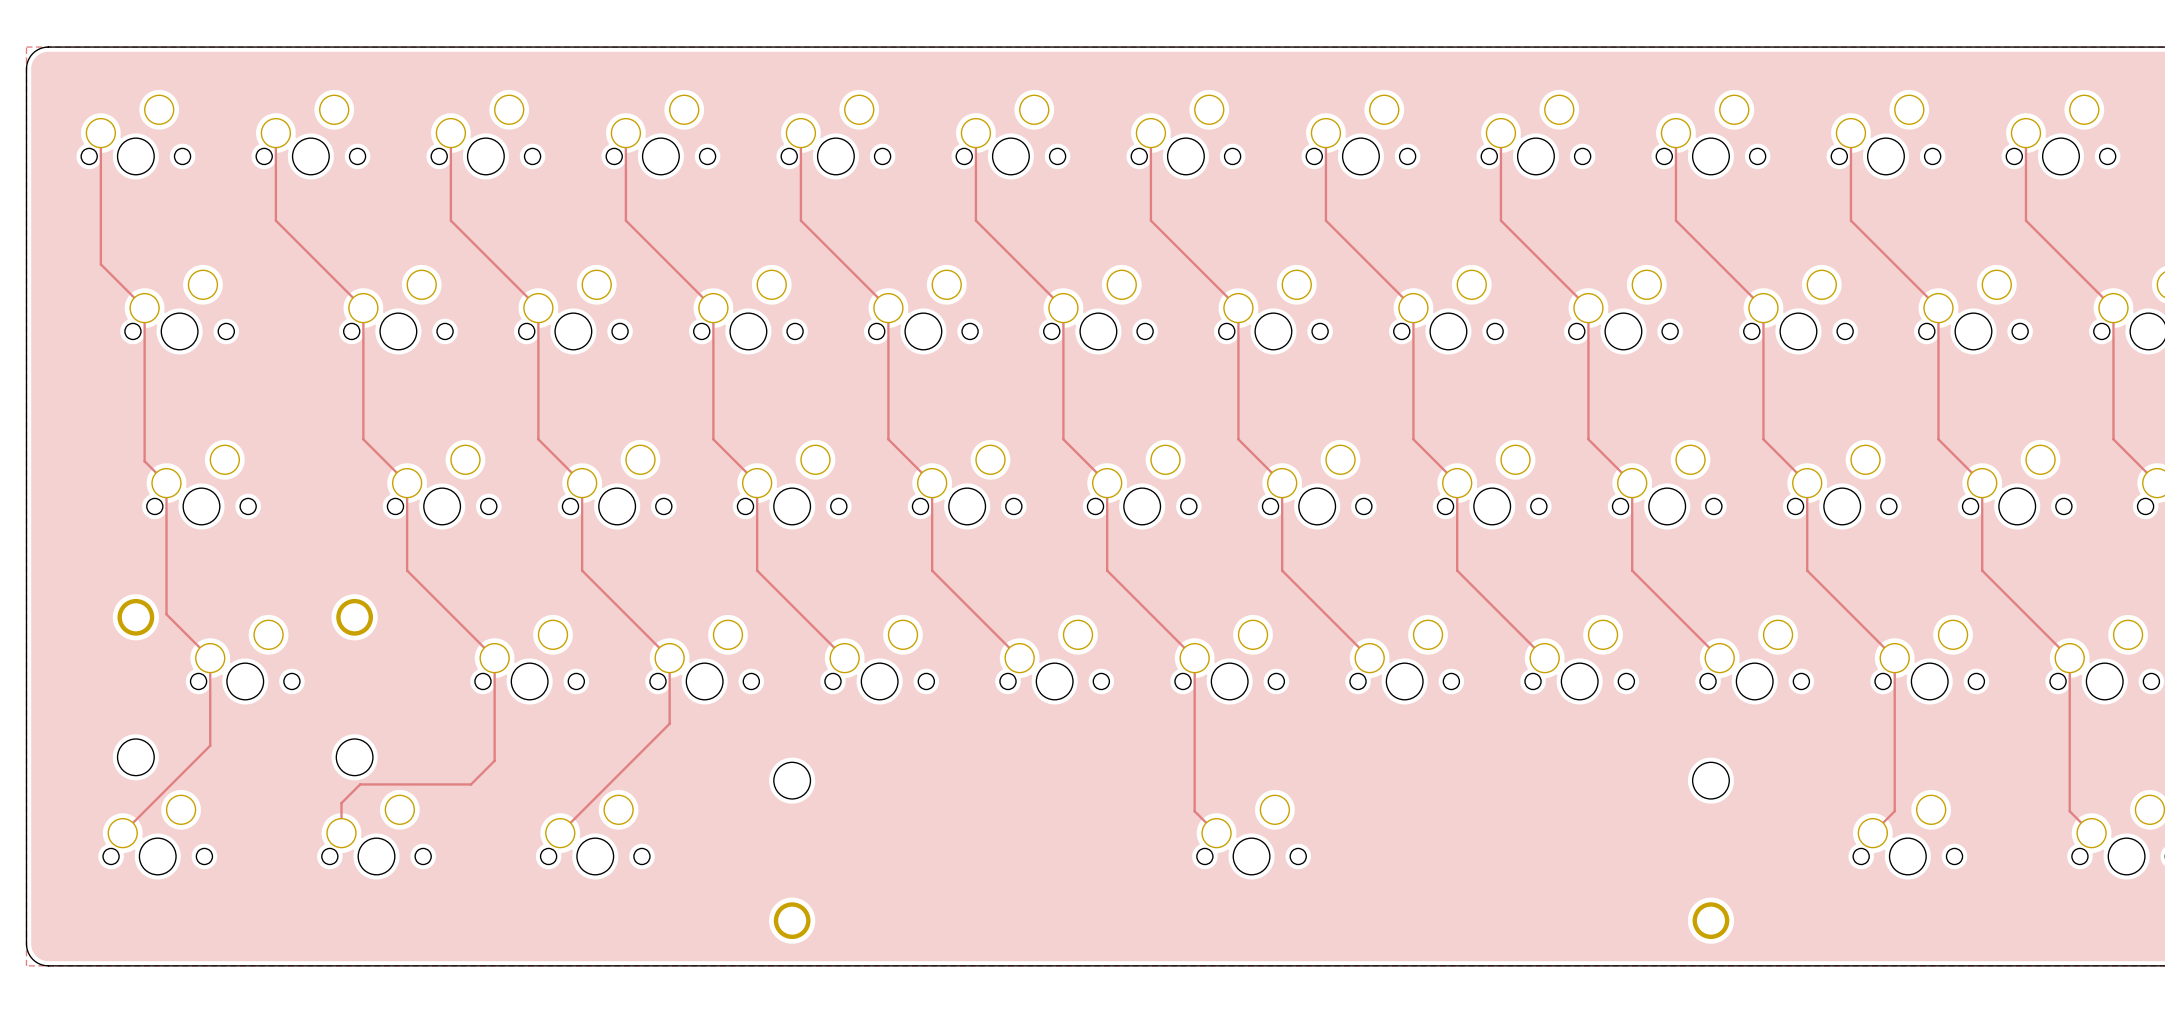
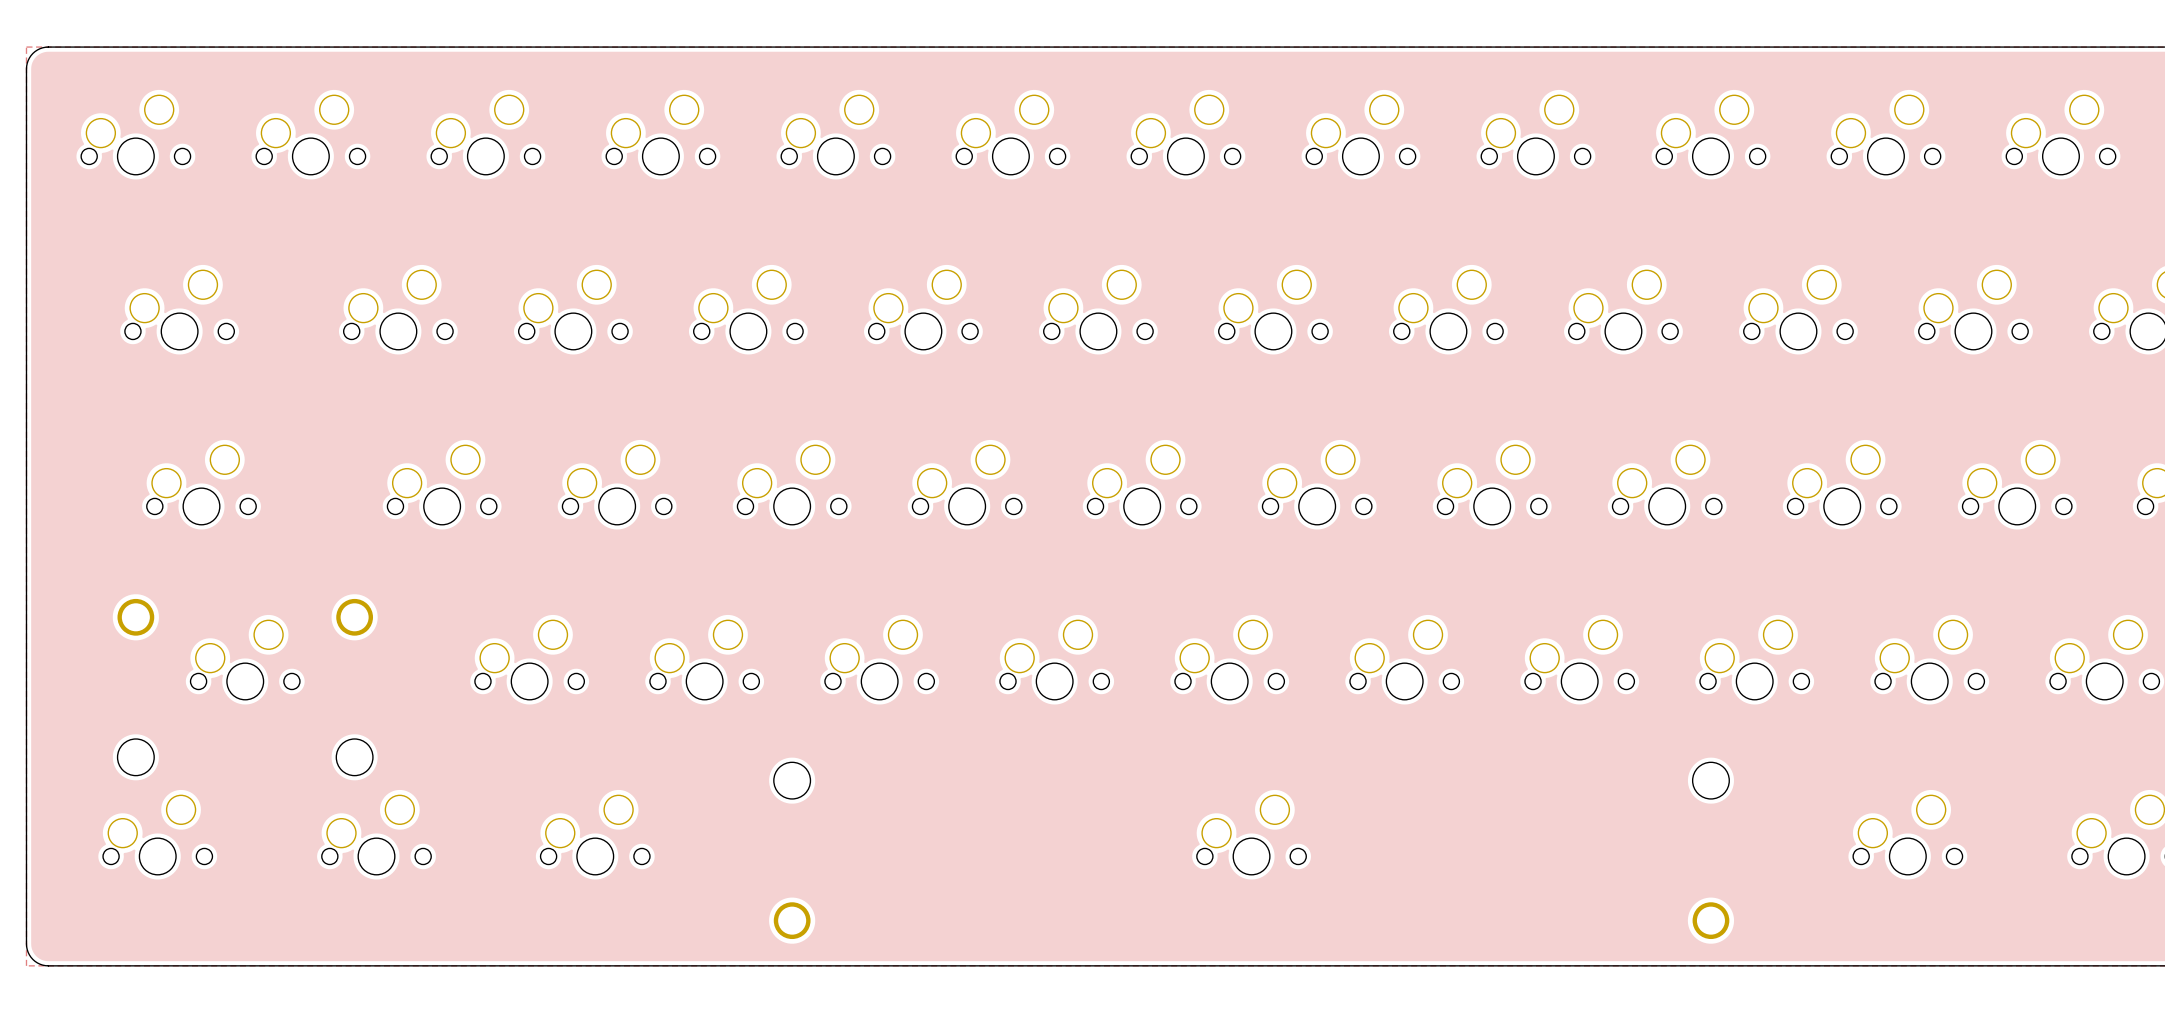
track: (100, 133) (100, 264) (144, 308) (144, 461) (166, 483) (166, 614) (210, 658) (210, 745) (122, 833) -> none
track: (275, 133) (275, 220) (363, 308) (363, 439) (407, 483) (407, 570) (494, 658) (494, 760) (471, 784) (360, 784) (341, 803) (341, 833) -> none
track: (450, 133) (450, 220) (538, 308) (538, 439) (582, 483) (582, 570) (669, 658) (669, 723) (560, 833) -> none
track: (625, 133) (625, 220) (713, 308) (713, 439) (757, 483) (757, 570) (844, 658) -> none
track: (800, 133) (800, 220) (888, 308) (888, 439) (932, 483) (932, 570) (1019, 658) -> none
track: (975, 133) (975, 220) (1063, 308) (1063, 439) (1107, 483) (1107, 570) (1194, 658) (1194, 811) (1216, 833) -> none
track: (1150, 133) (1150, 220) (1238, 308) (1238, 439) (1282, 483) (1282, 570) (1369, 658) -> none
track: (1325, 133) (1325, 220) (1413, 308) (1413, 439) (1457, 483) (1457, 570) (1544, 658) -> none
track: (1500, 133) (1500, 220) (1588, 308) (1588, 439) (1632, 483) (1632, 570) (1719, 658) -> none
track: (1675, 133) (1675, 220) (1763, 308) (1763, 439) (1807, 483) (1807, 570) (1894, 658) (1894, 811) (1872, 833) -> none
track: (1850, 133) (1850, 220) (1938, 308) (1938, 439) (1982, 483) (1982, 570) (2069, 658) (2069, 811) (2091, 833) -> none
track: (2025, 133) (2025, 220) (2113, 308) (2113, 439) (2157, 483) -> none

